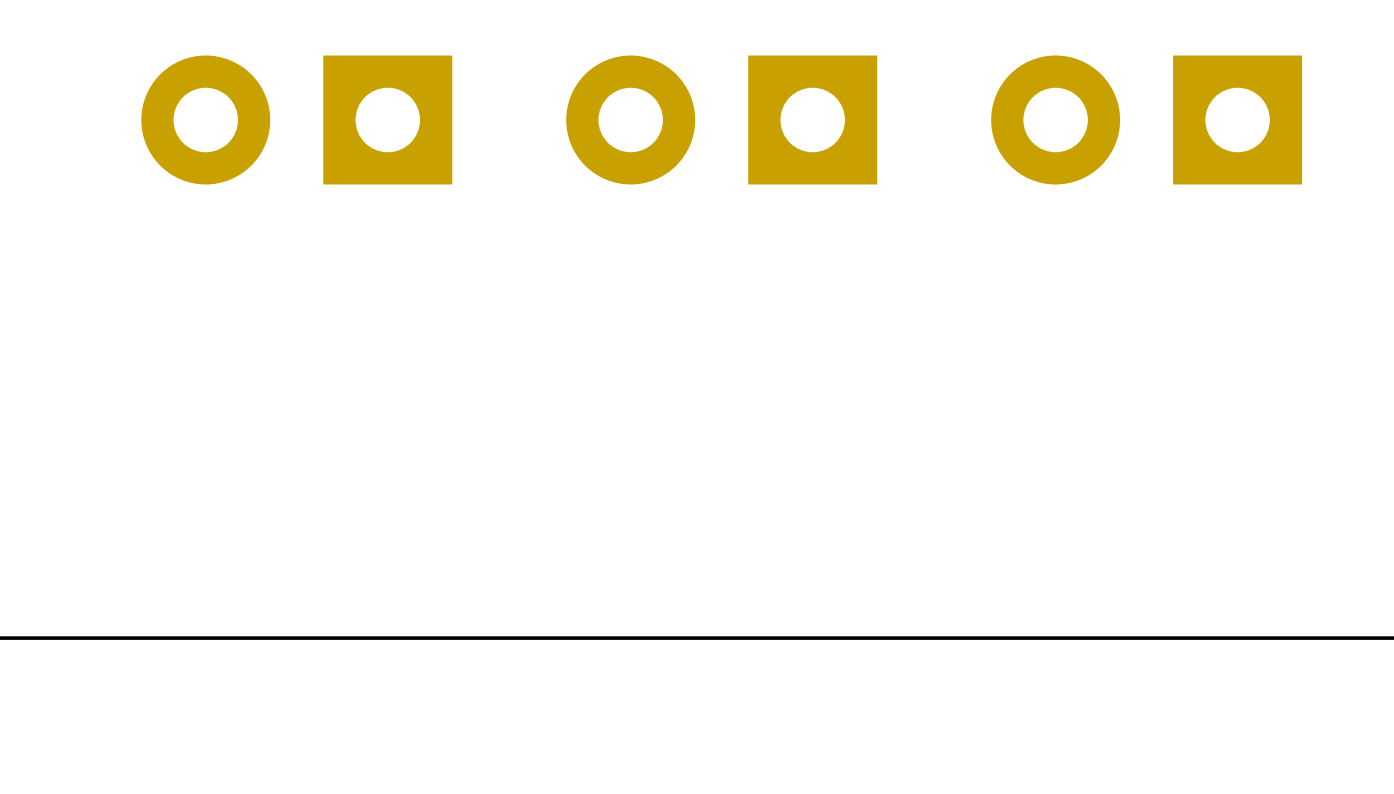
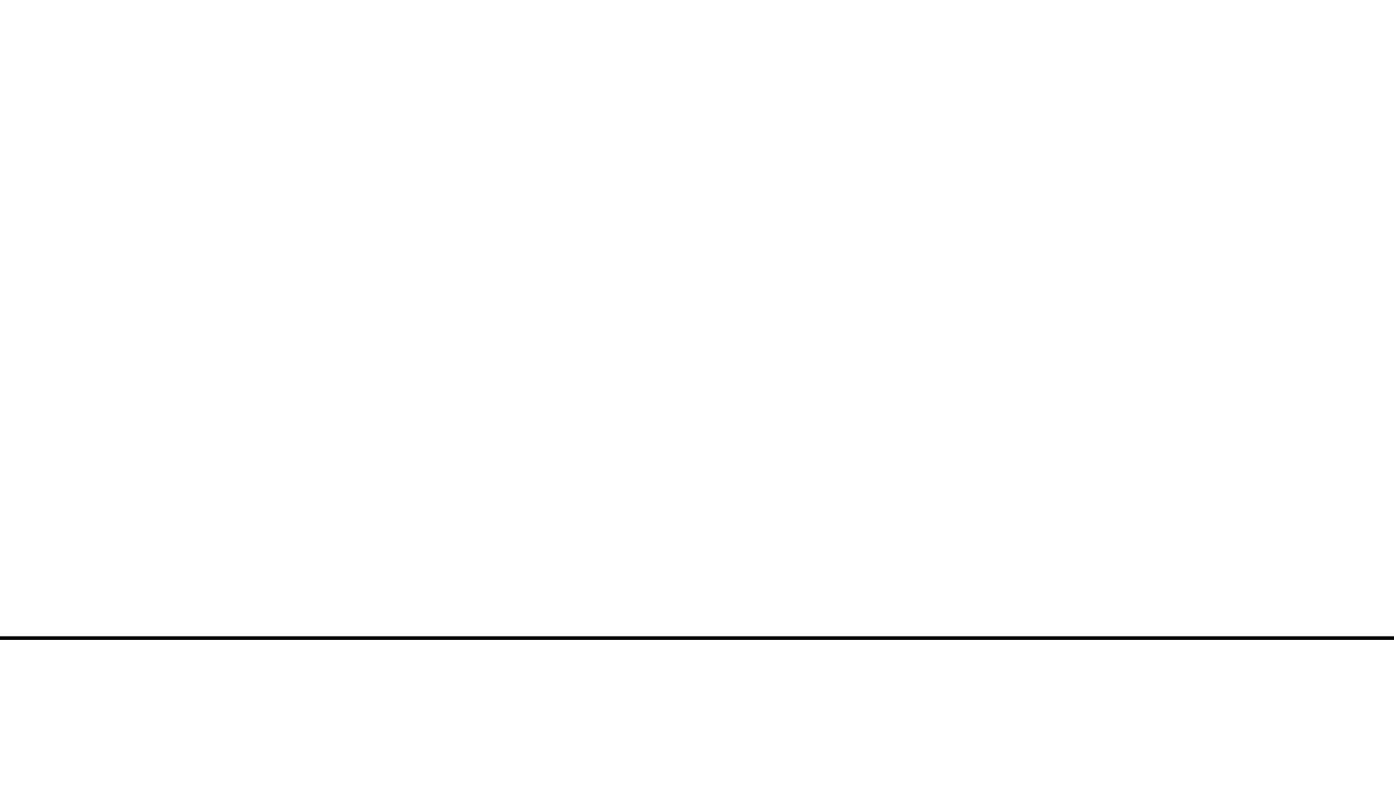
part: (296, 119) -> none
part: (721, 119) -> none
part: (1146, 119) -> none

